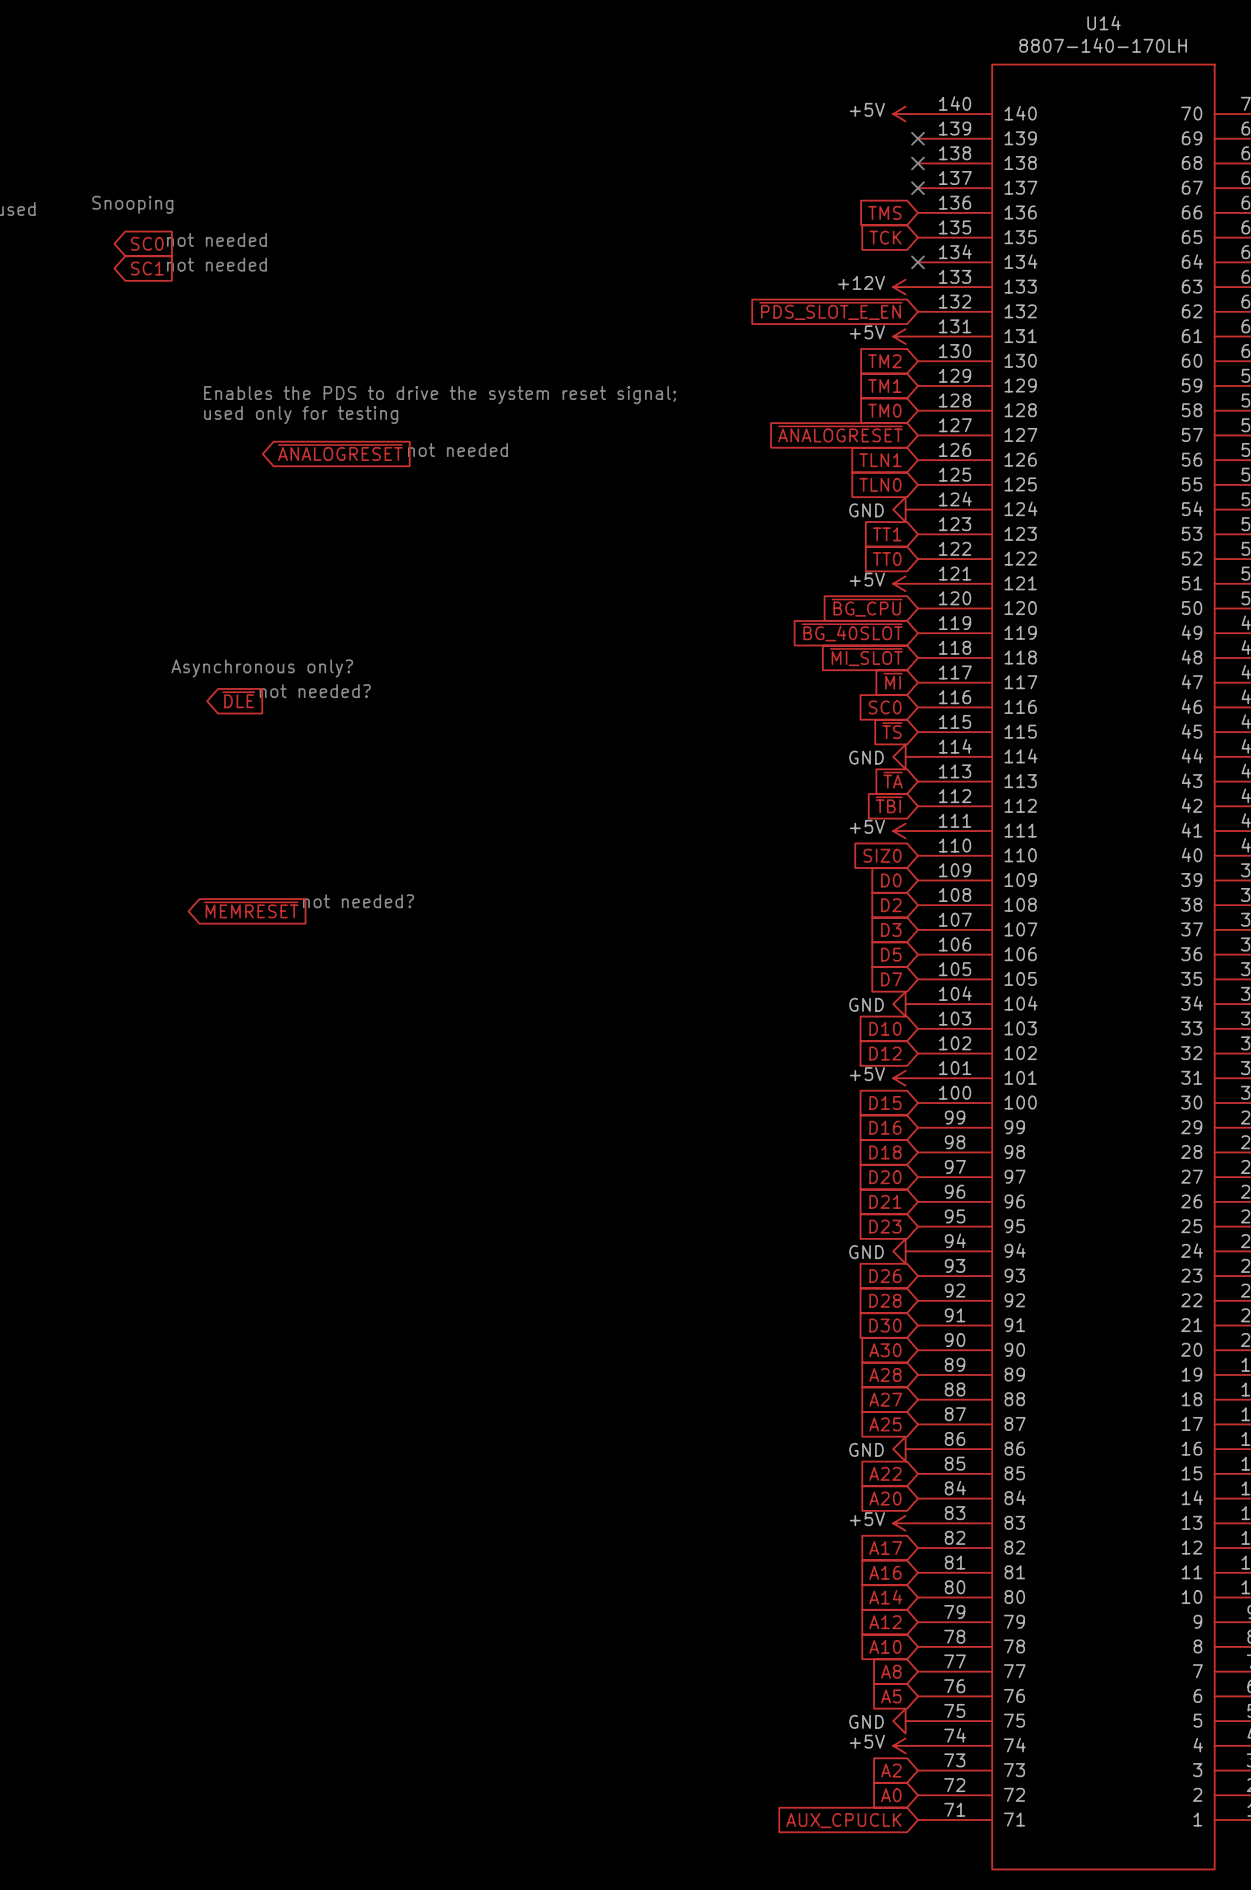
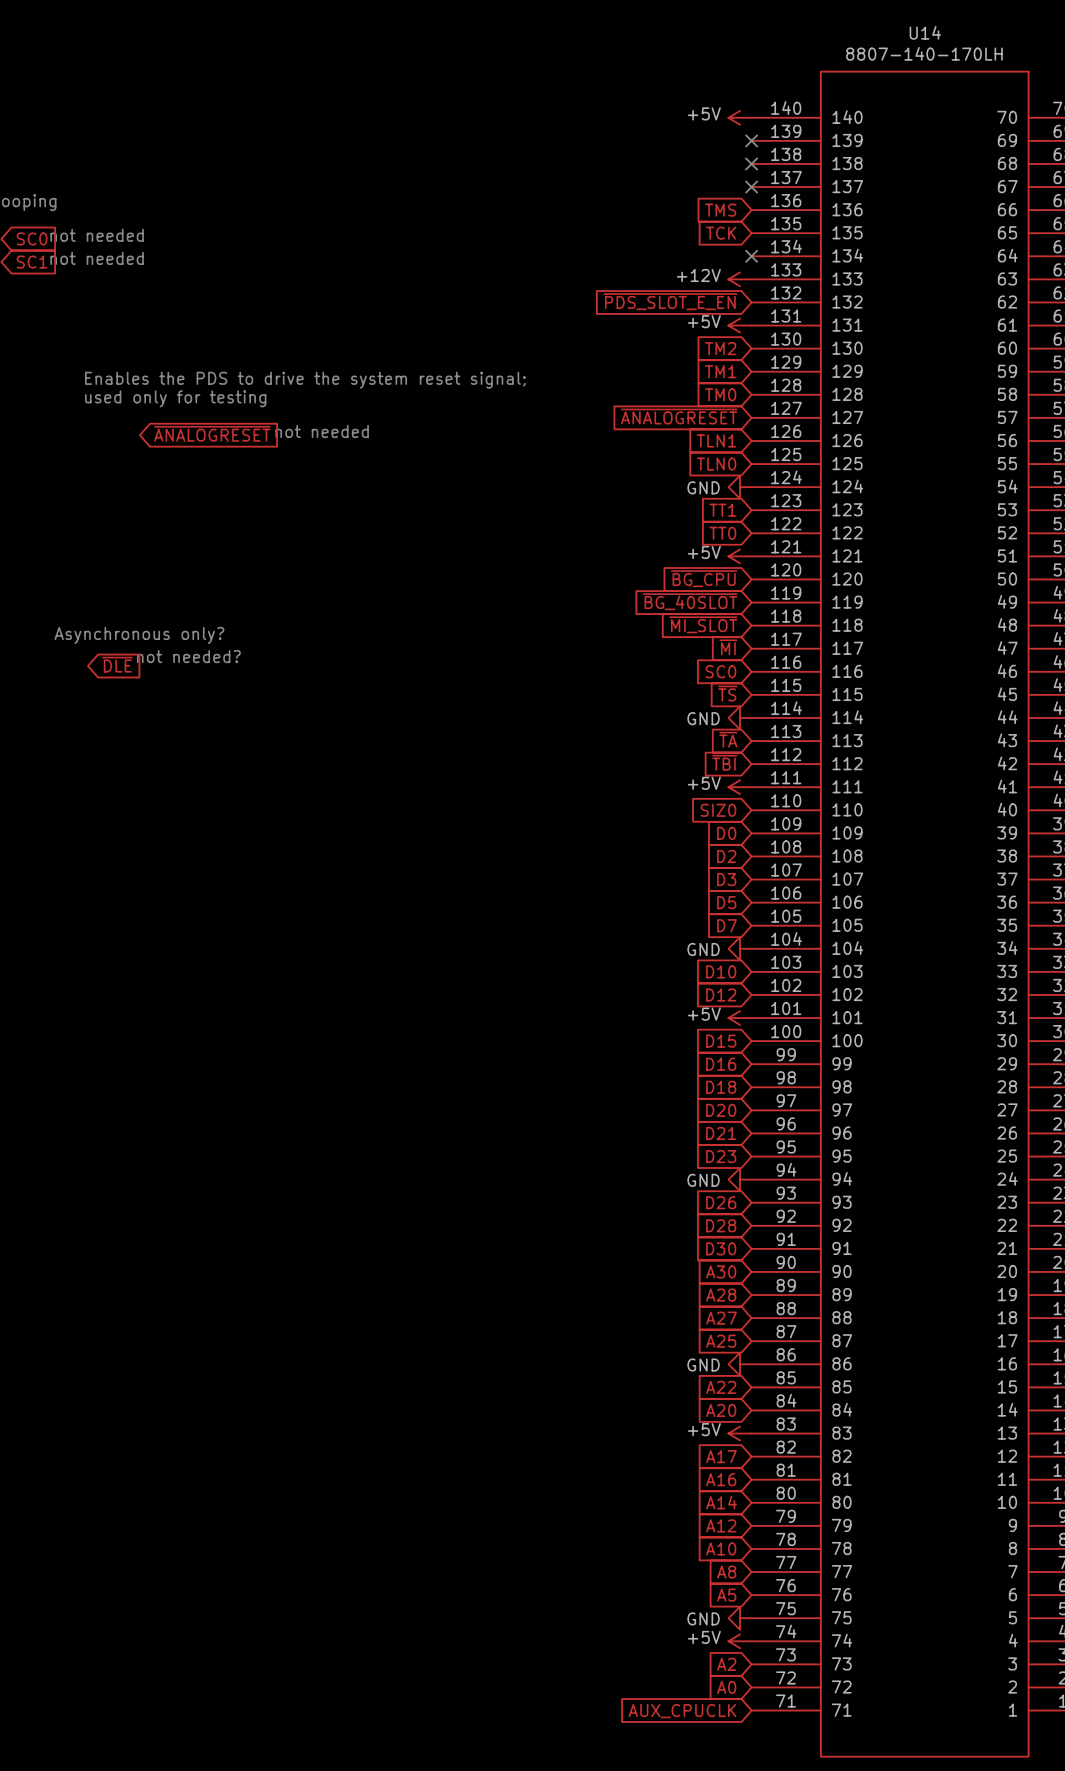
text: not needed? (358, 901) -> none
global label: ~{MEMRESET} (251, 909) -> none

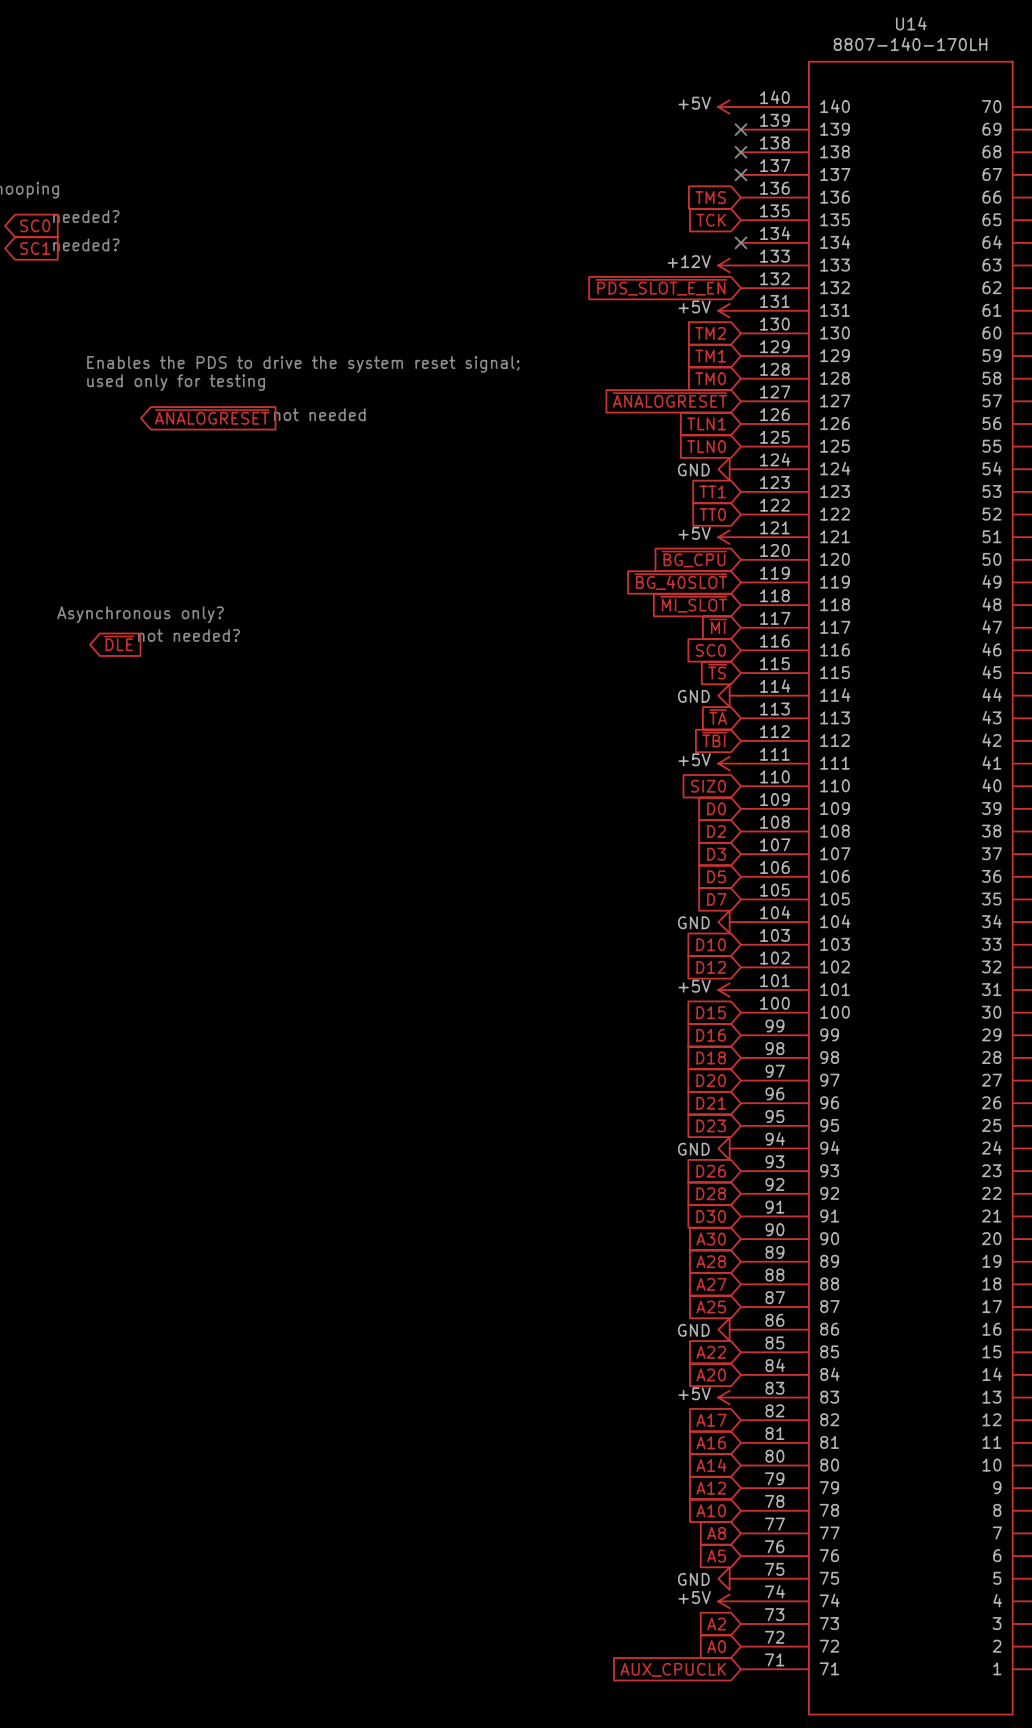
text: not needed (97, 235) -> needed? (86, 216)
text: not needed (97, 258) -> needed? (86, 244)

